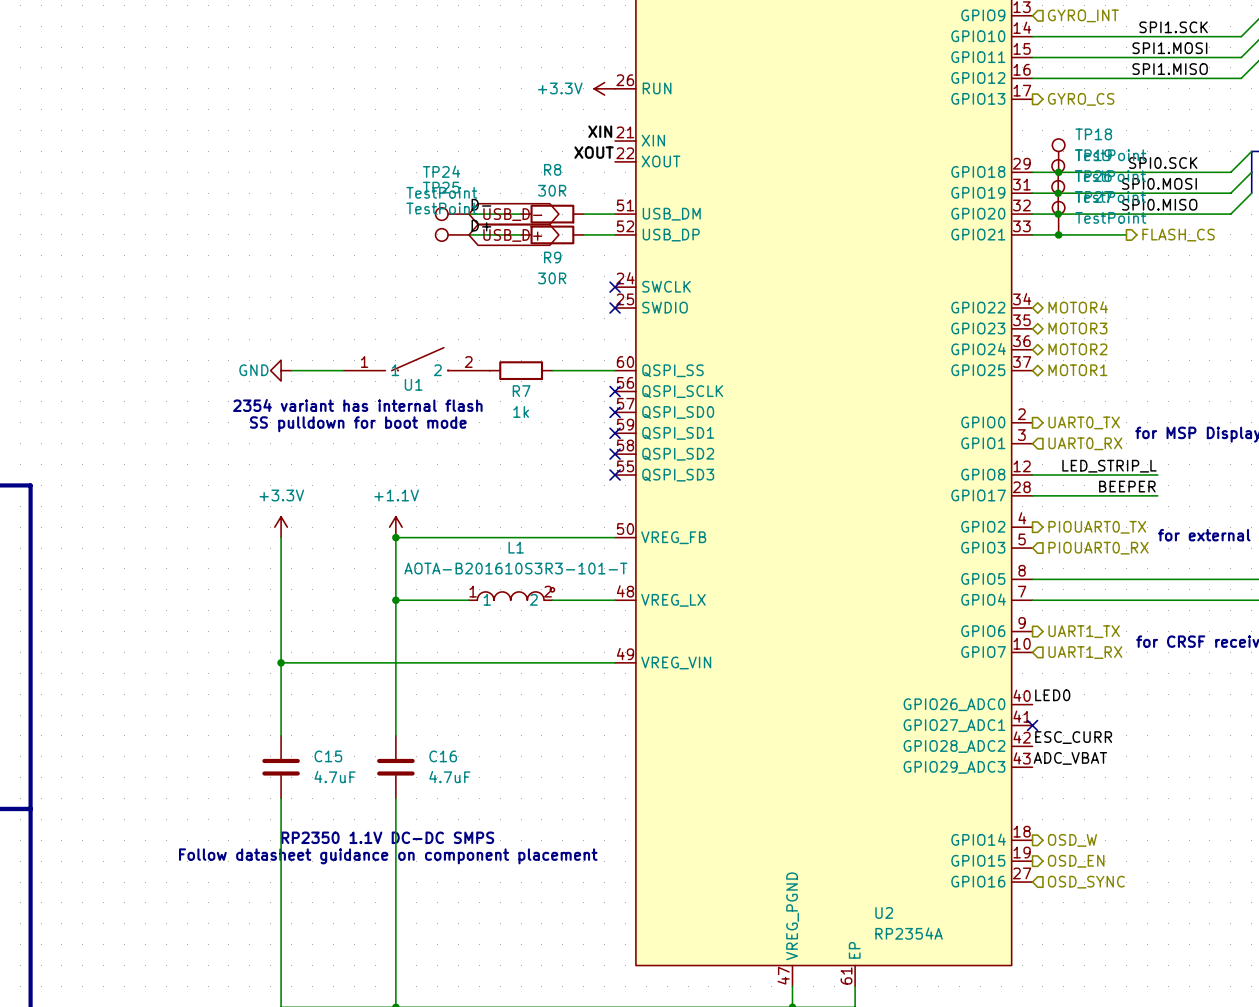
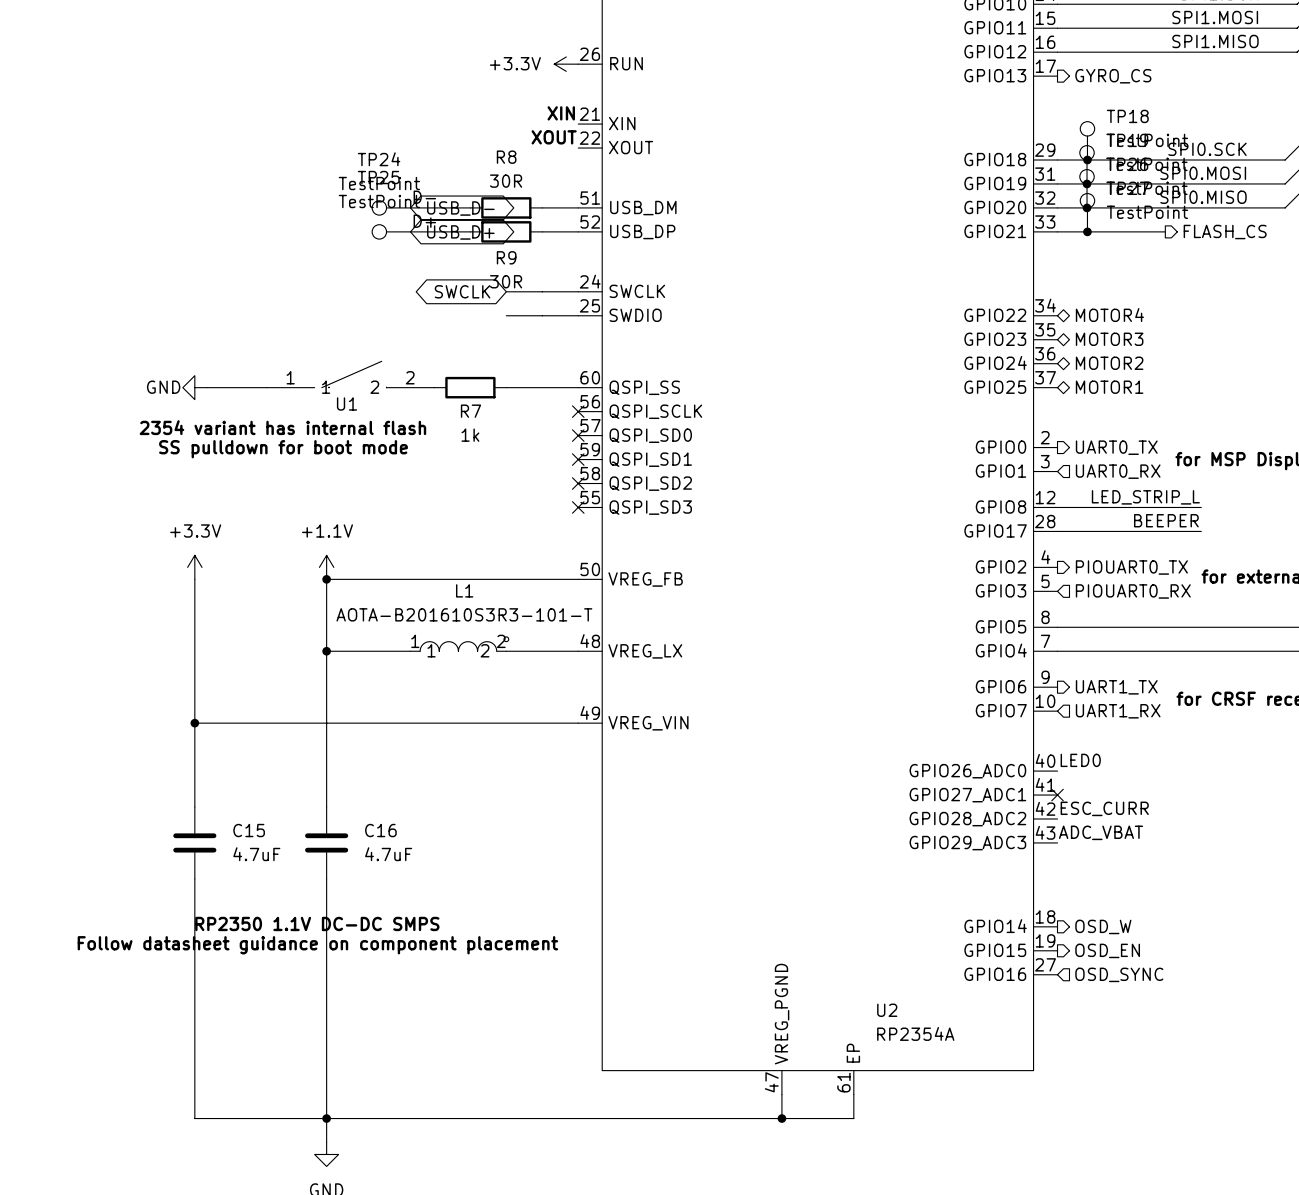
global label: none -> SWCLK (462, 291)
wire: none -> (506, 291) (578, 291)
no-connect mark: (615, 287) -> none
wire: none -> (506, 315) (578, 315)
no-connect mark: (615, 308) -> none

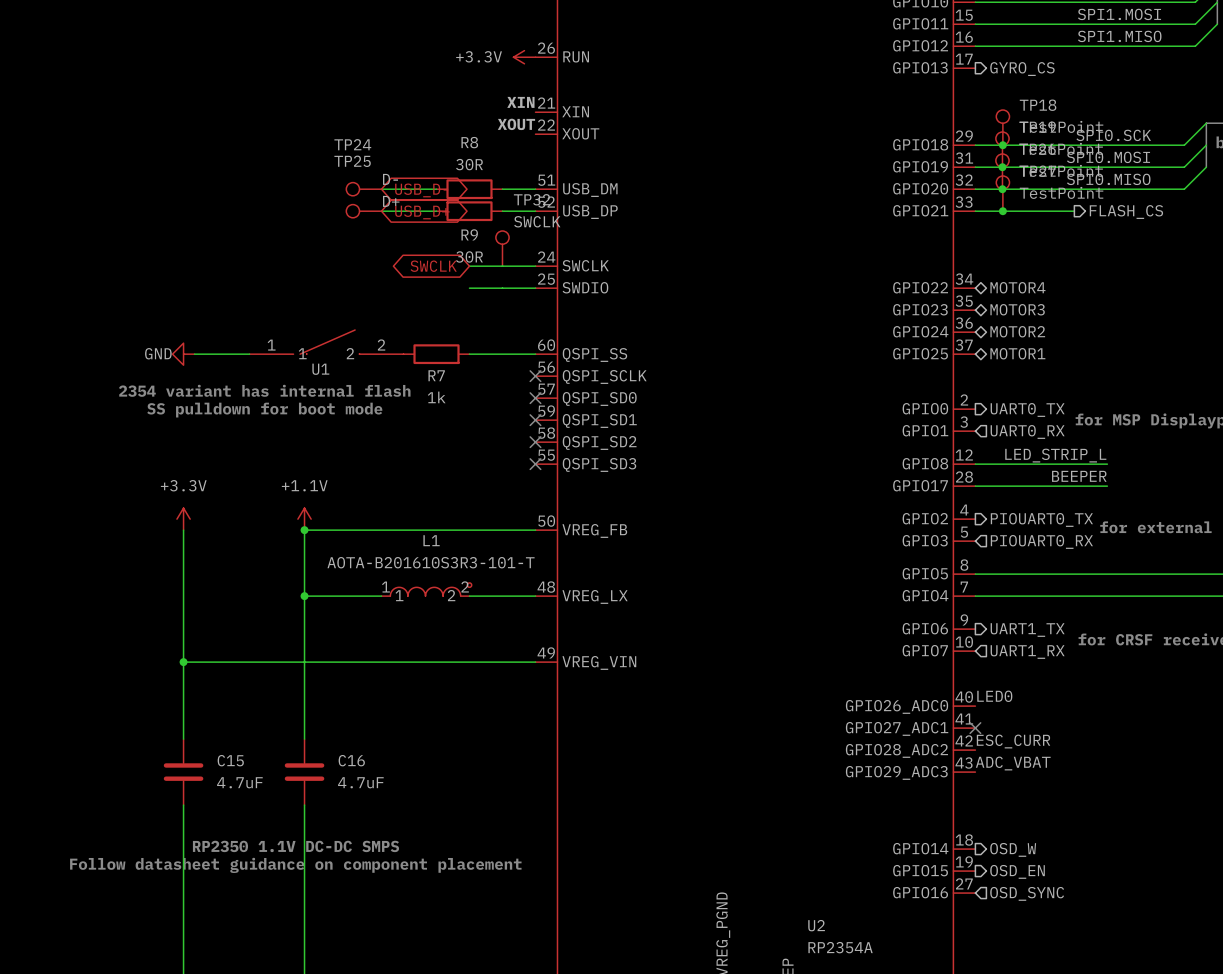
TP24 value: TestPoint (379, 183) -> none
TP25 value: TestPoint (379, 201) -> none
TP32: none -> SWCLK (502, 248)

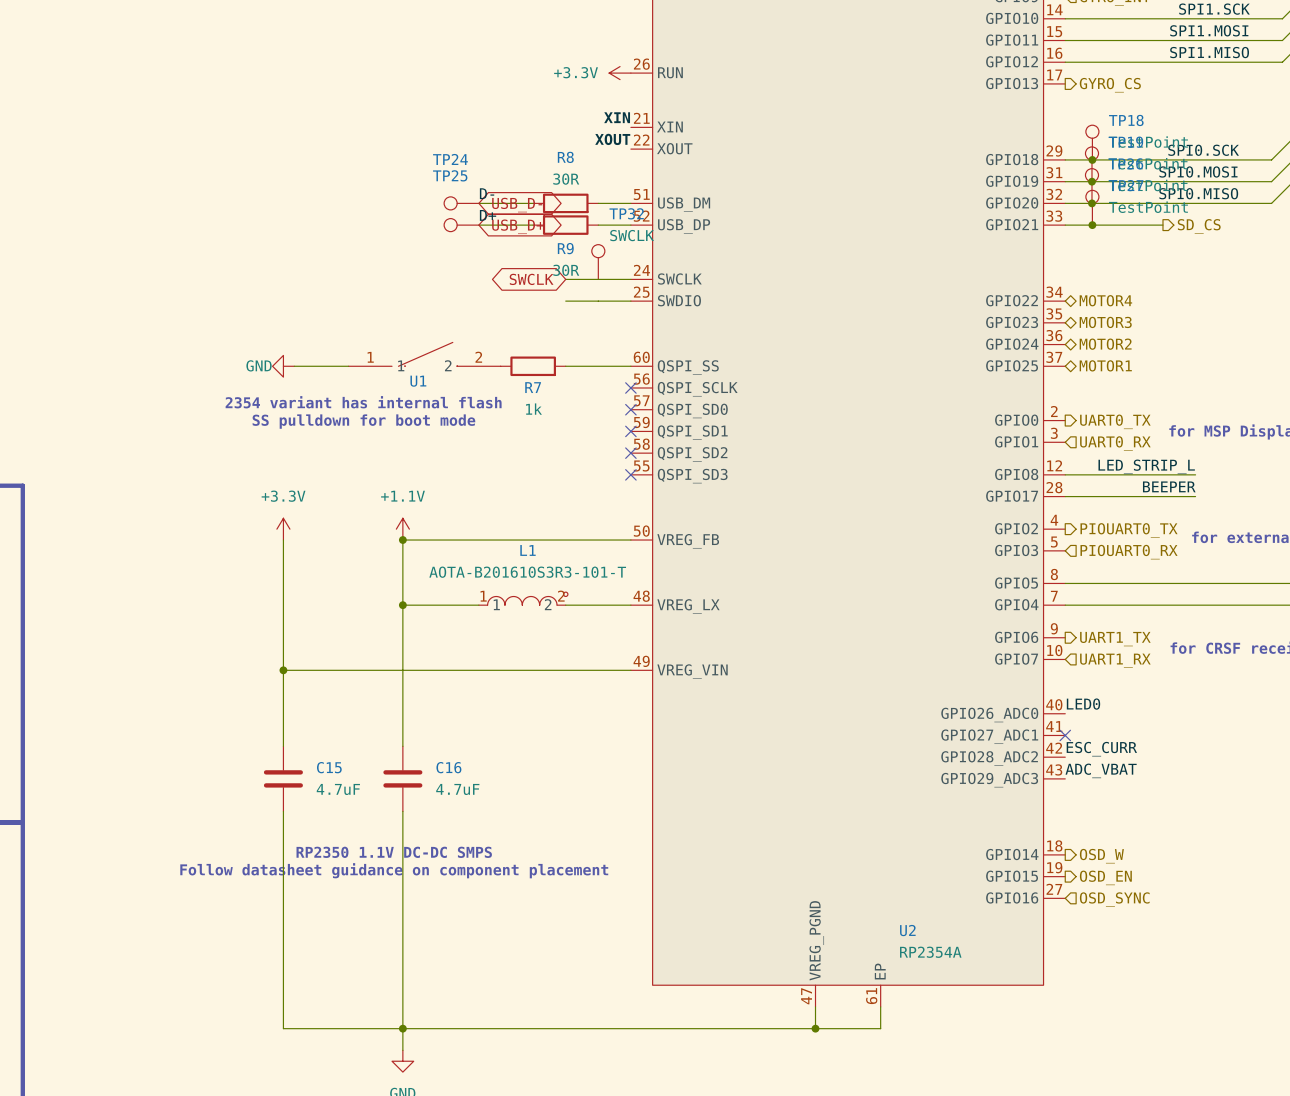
hierarchical label: FLASH_CS (1126, 212) -> SD_CS (1199, 226)

